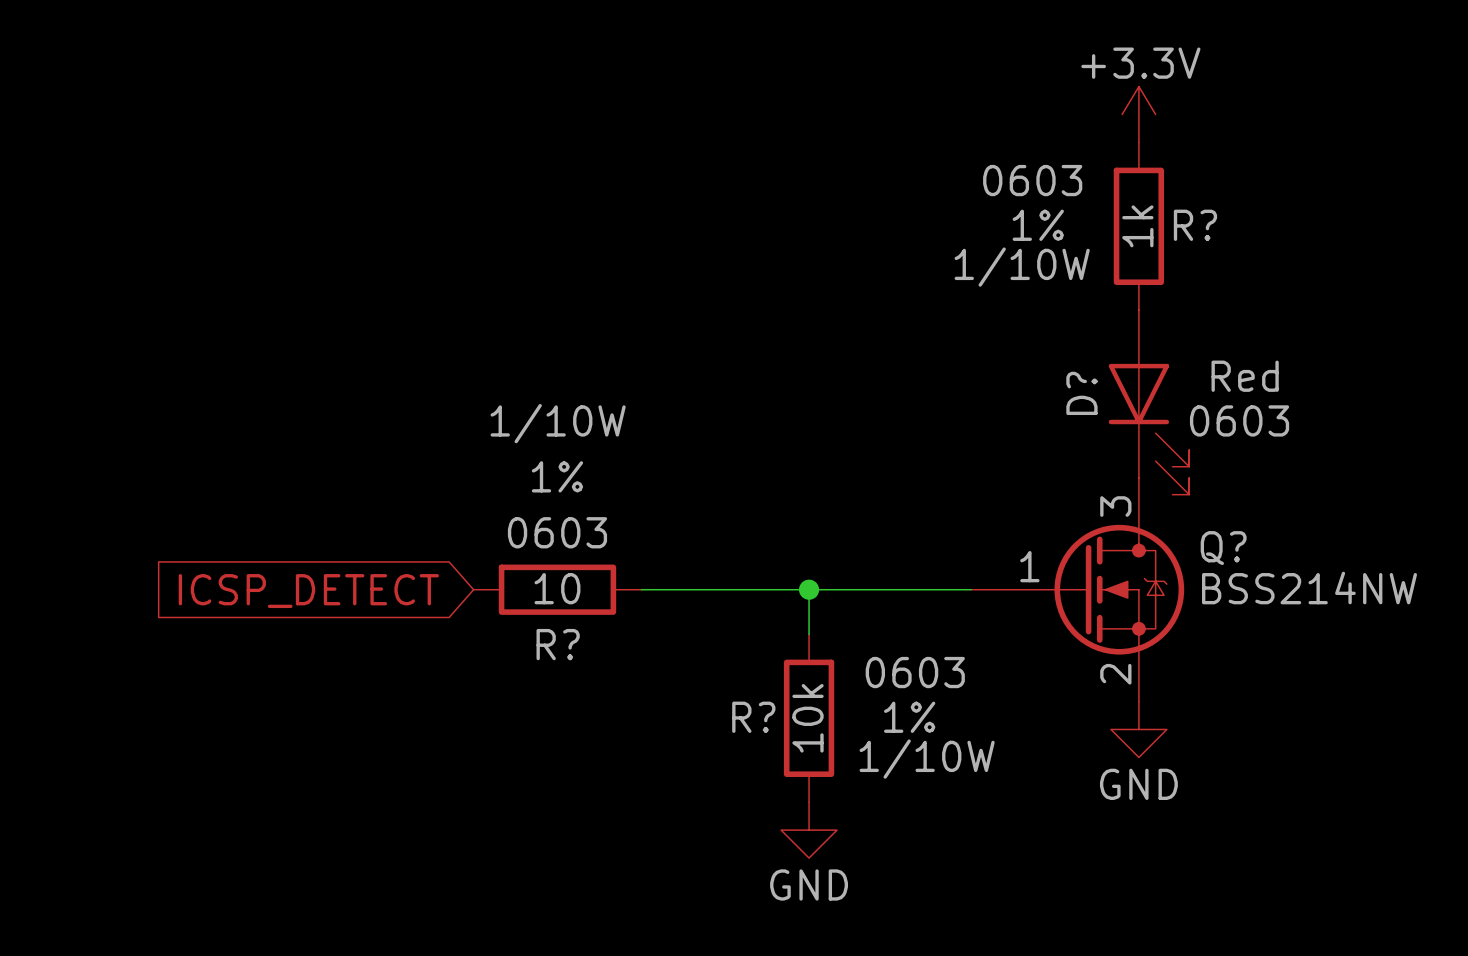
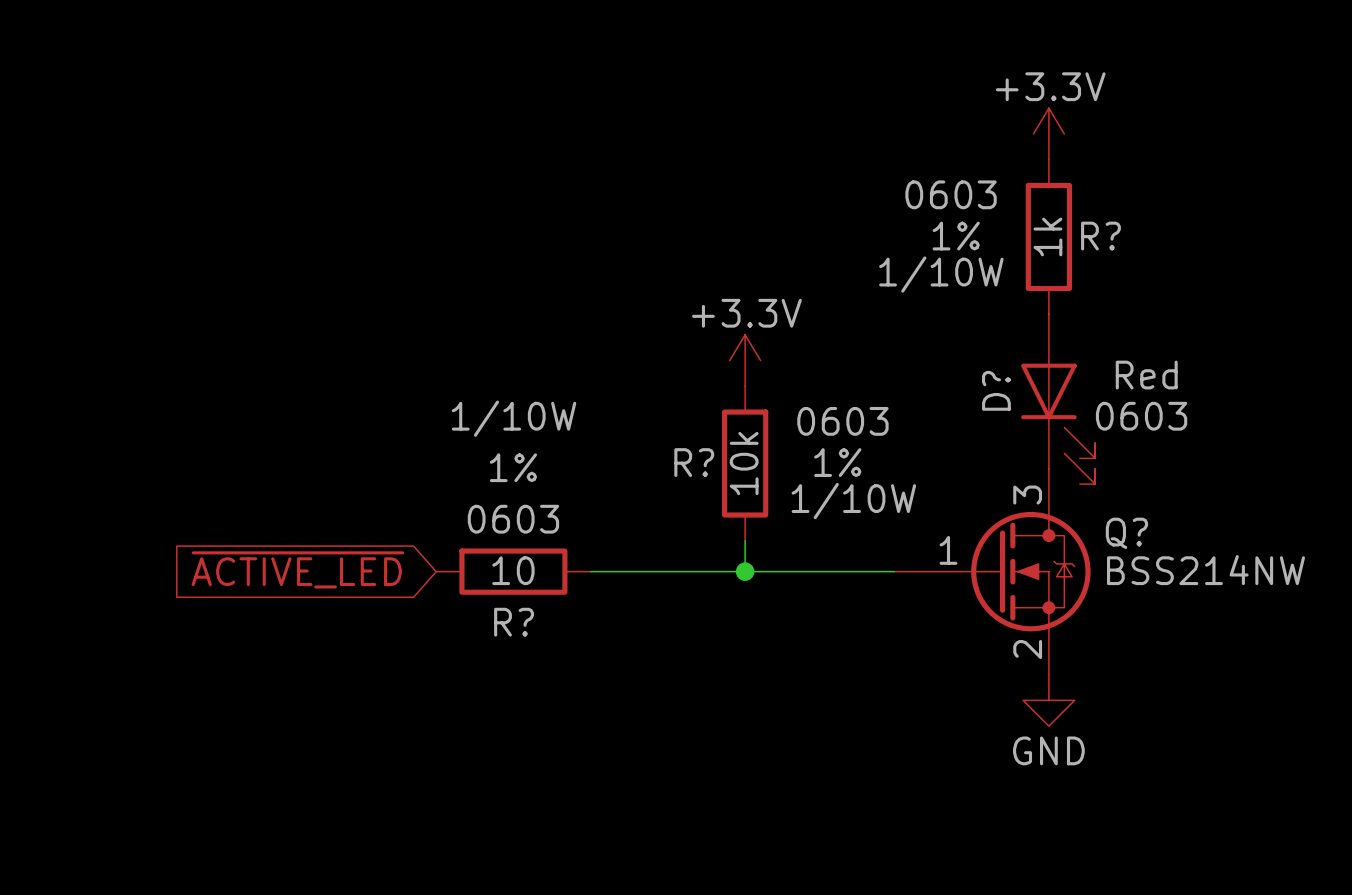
power symbol: none -> +3.3V (745, 360)
wire: (809, 589) (809, 634) -> (745, 571) (745, 540)
global label: ICSP_DETECT (308, 591) -> ~{ACTIVE_LED} (297, 569)
R? position: (809, 718) -> (745, 463)
power symbol: GND (809, 830) -> none

